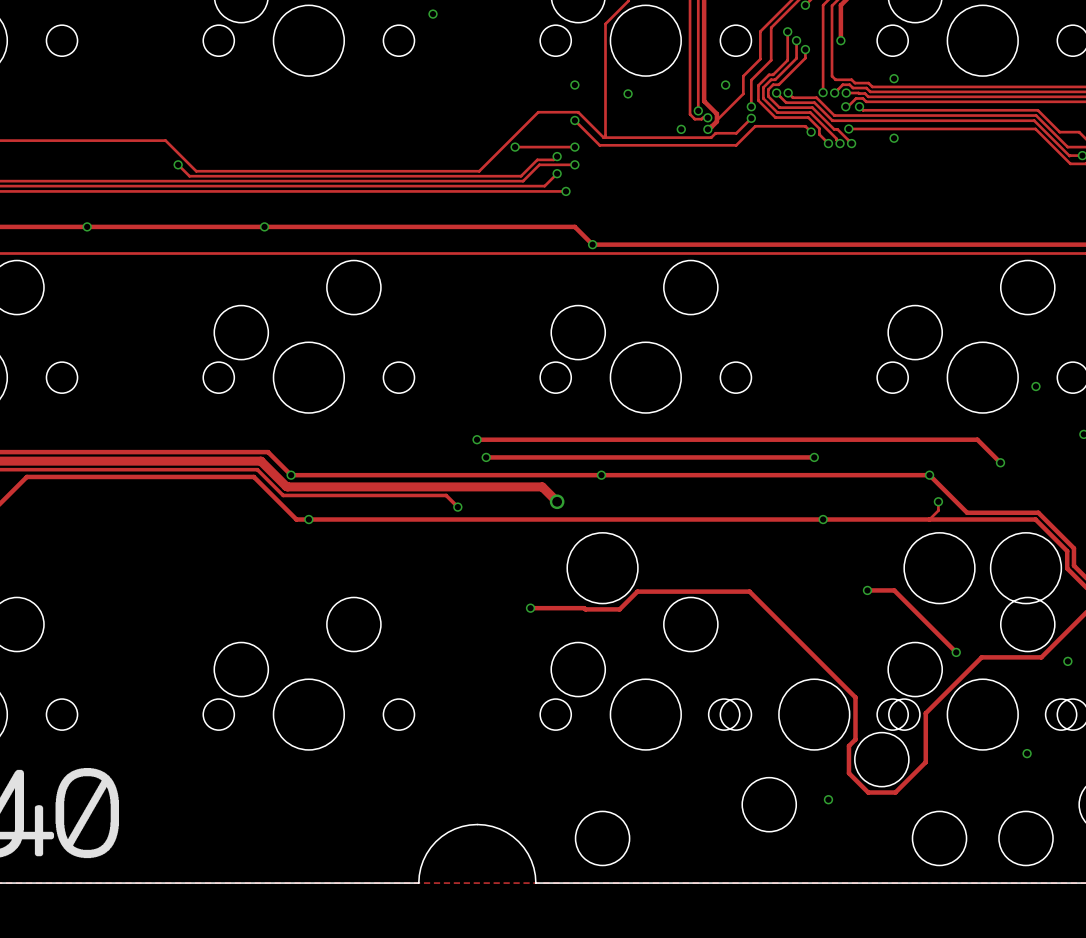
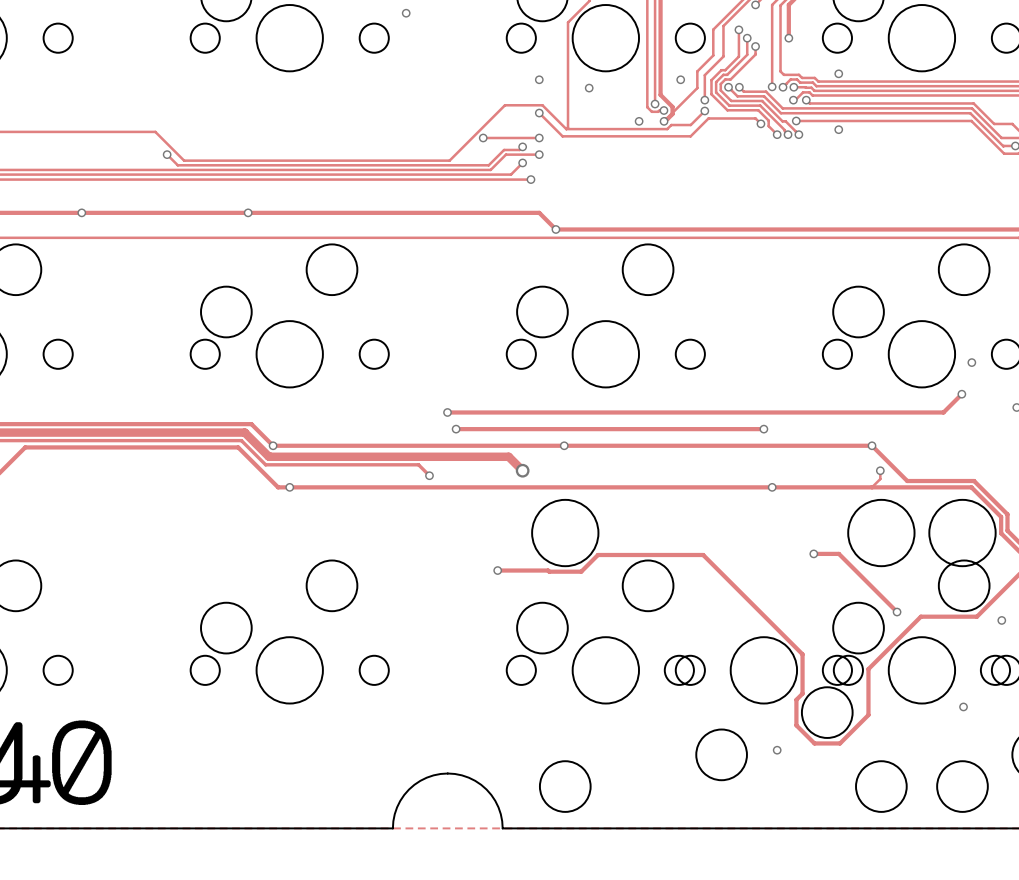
track: (977, 439) (1000, 462) -> (916, 412) (943, 412) (961, 394)
via position: (1000, 462) -> (961, 394)

